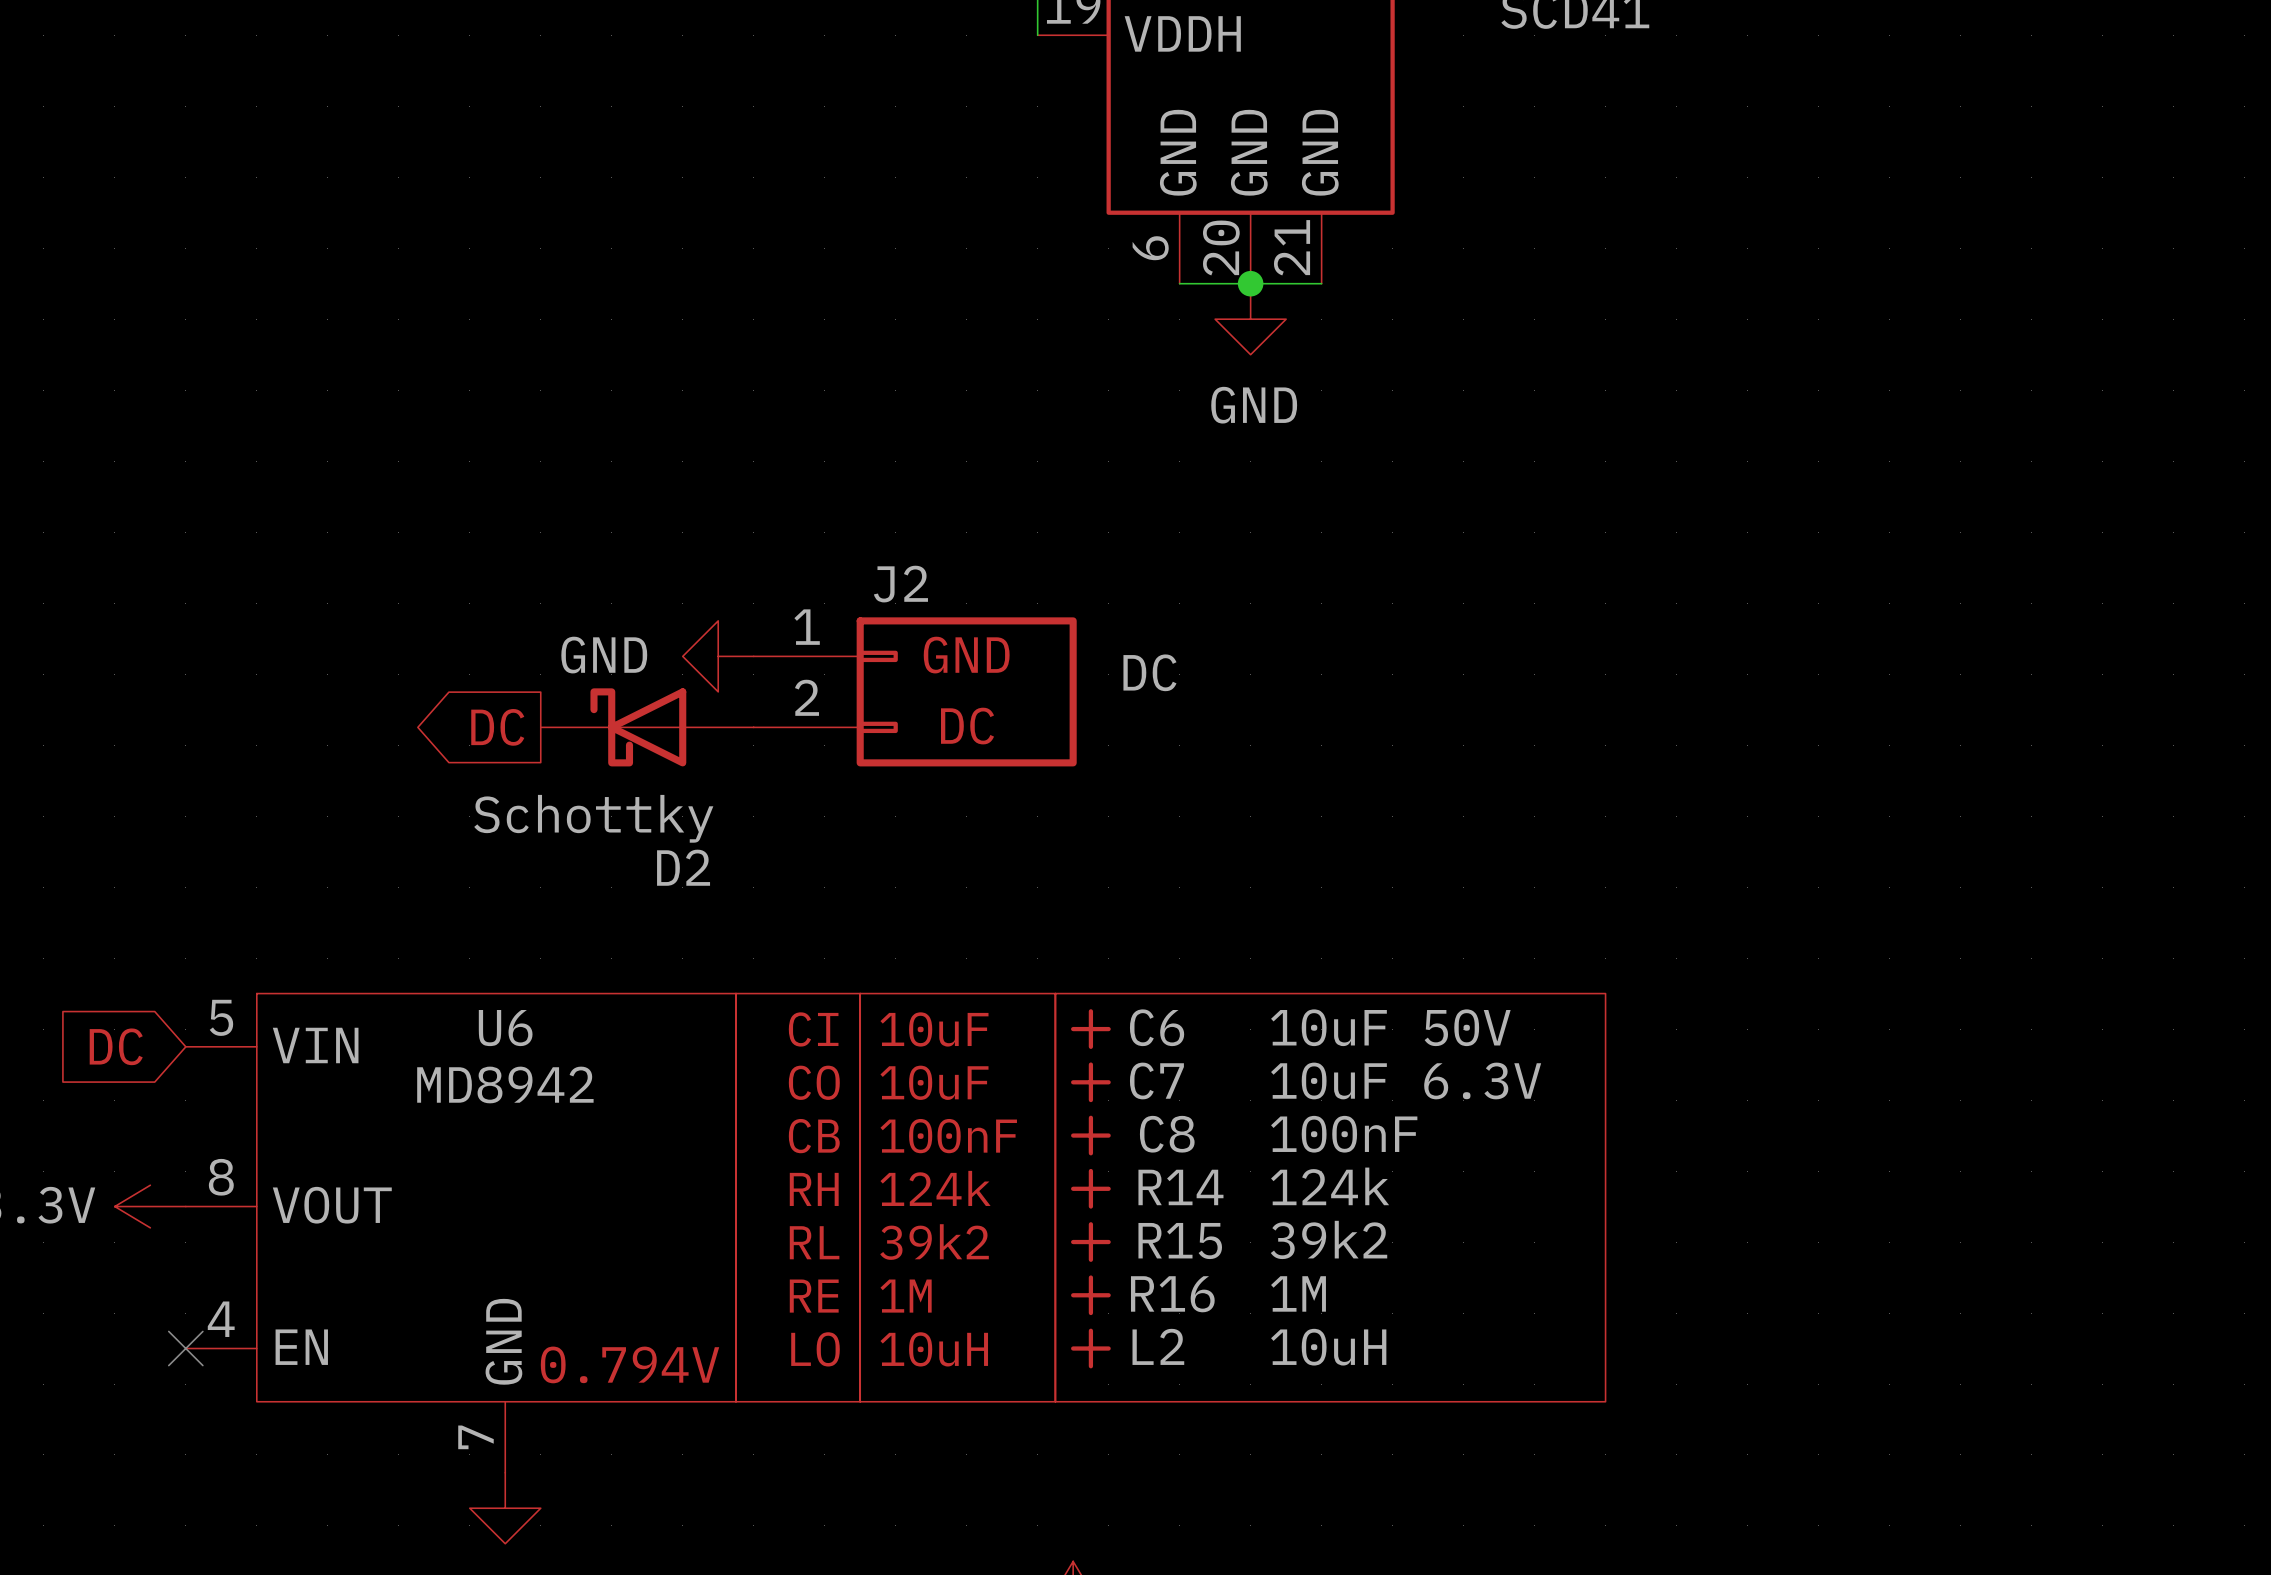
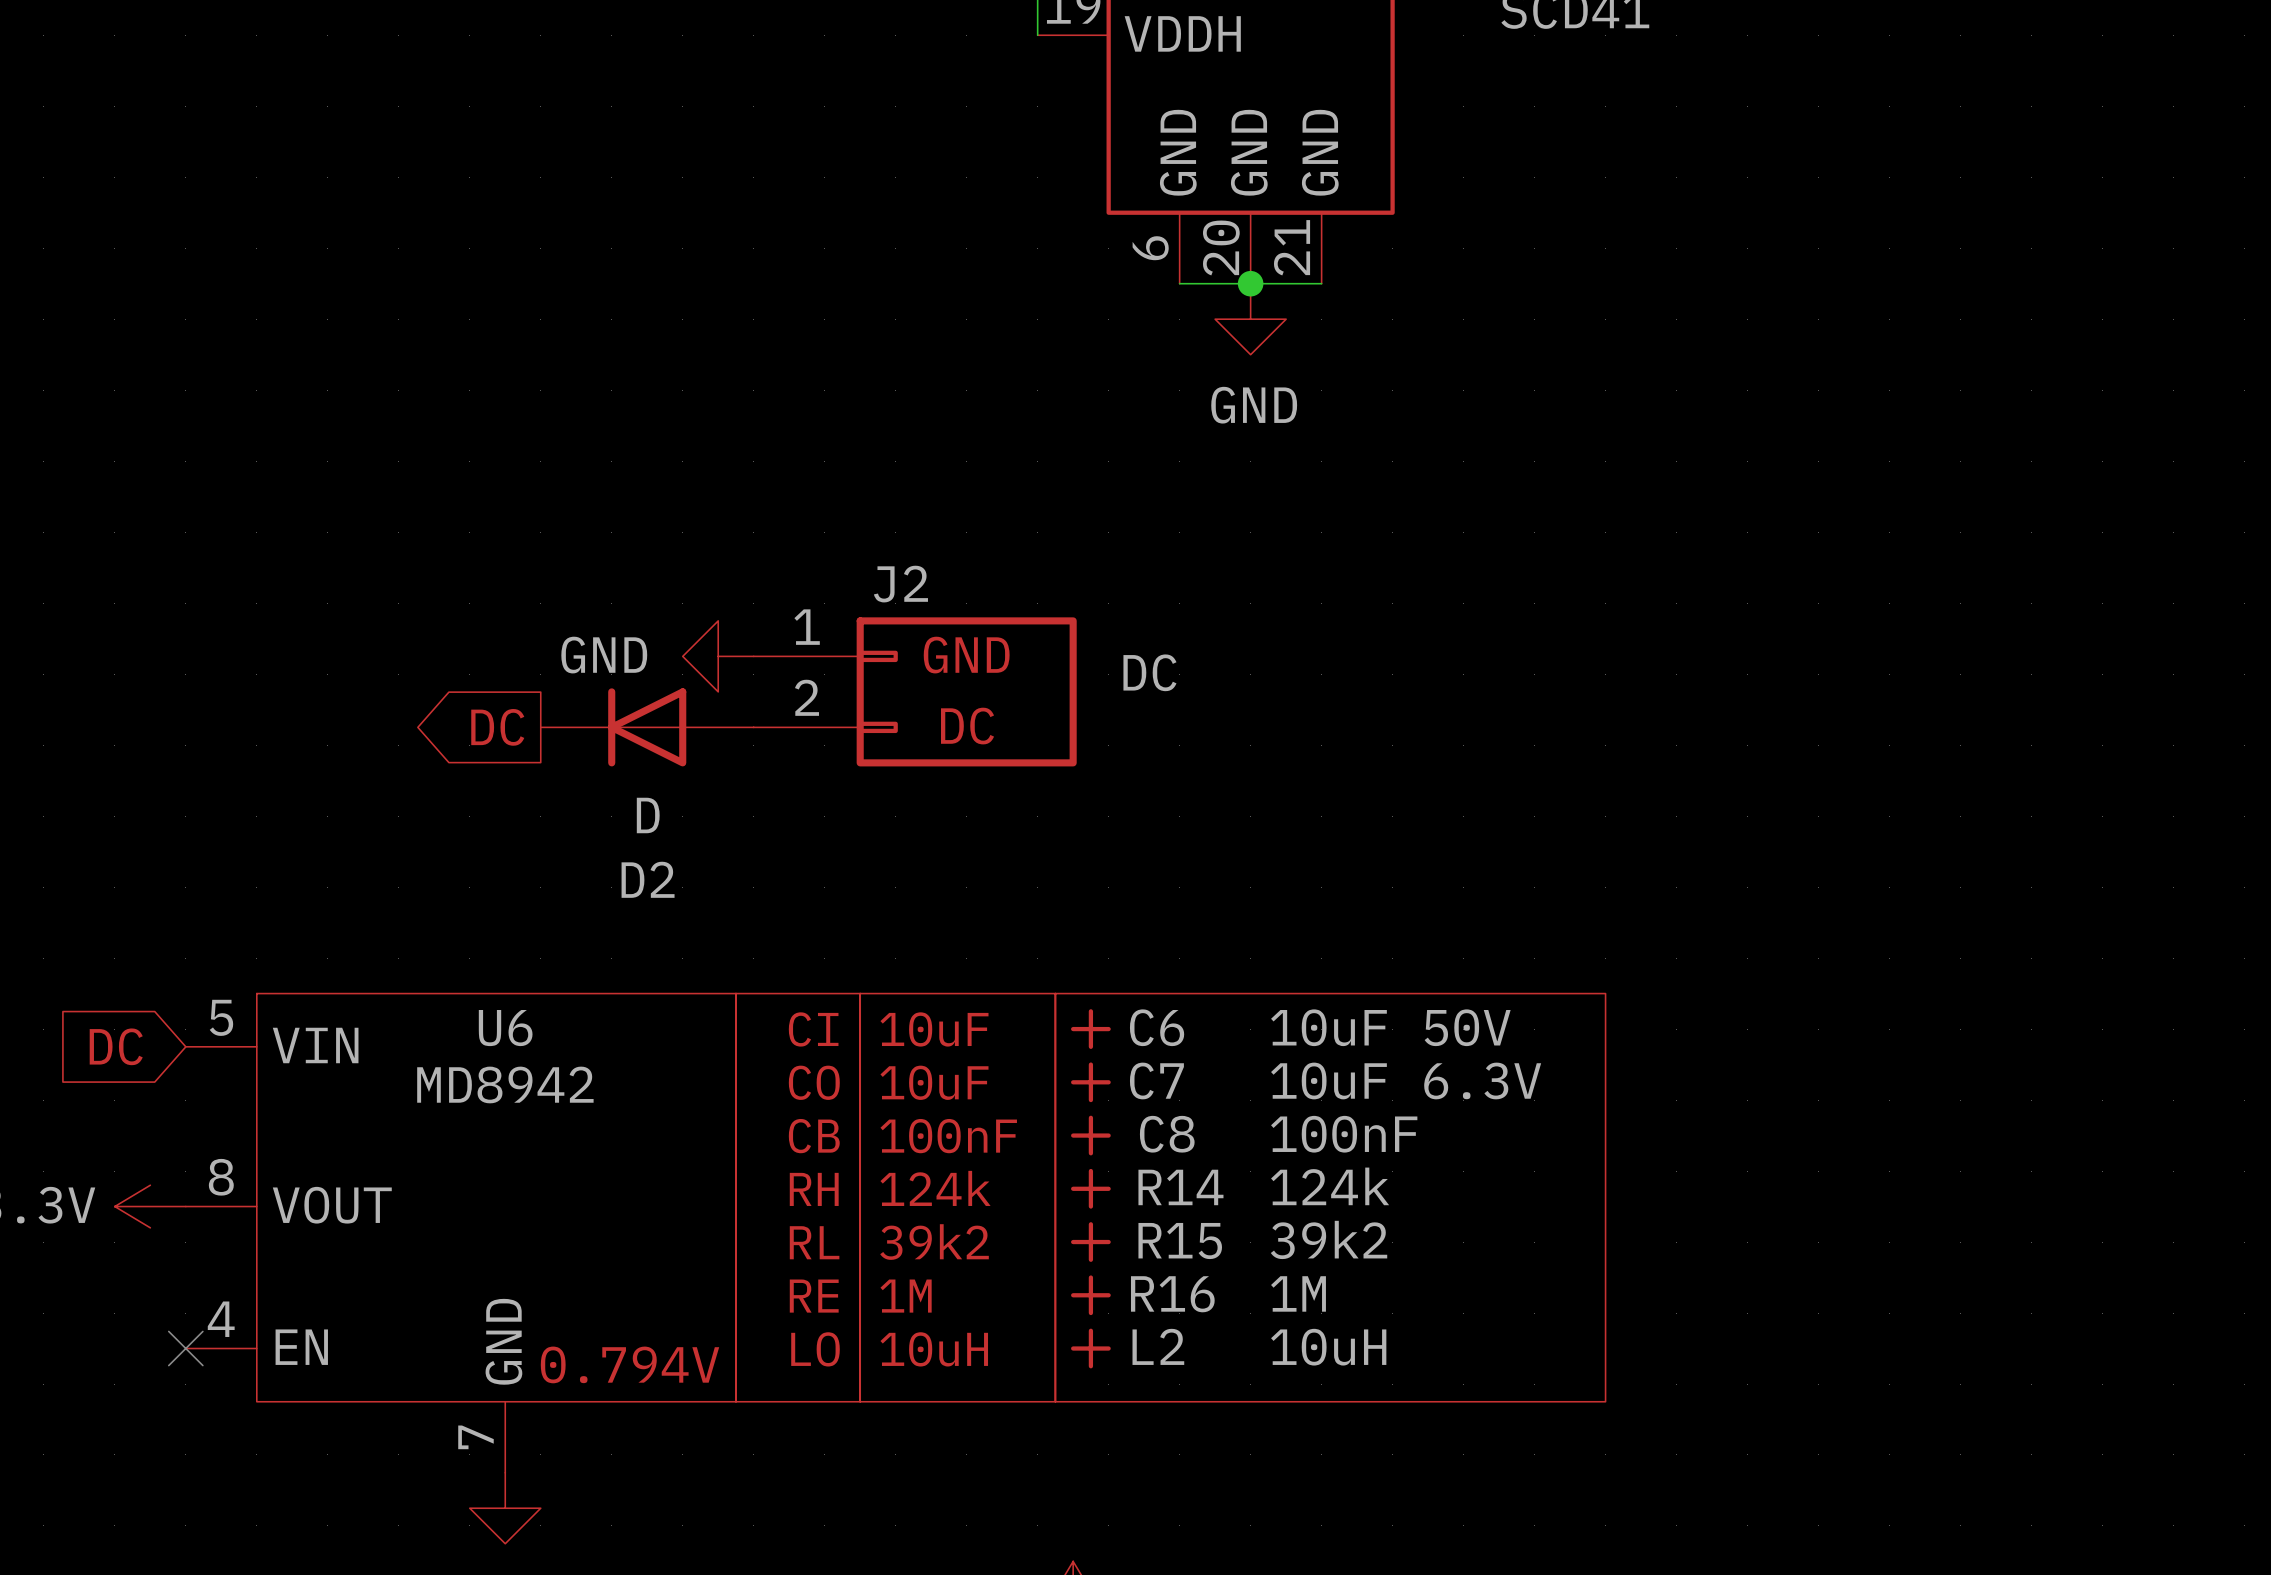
D2 symbol: [540, 688, 754, 767] -> [540, 688, 754, 767]
D2 value: Schottky (593, 818) -> D (648, 815)
D2 name position: D2 (683, 867) -> D2 (648, 879)

